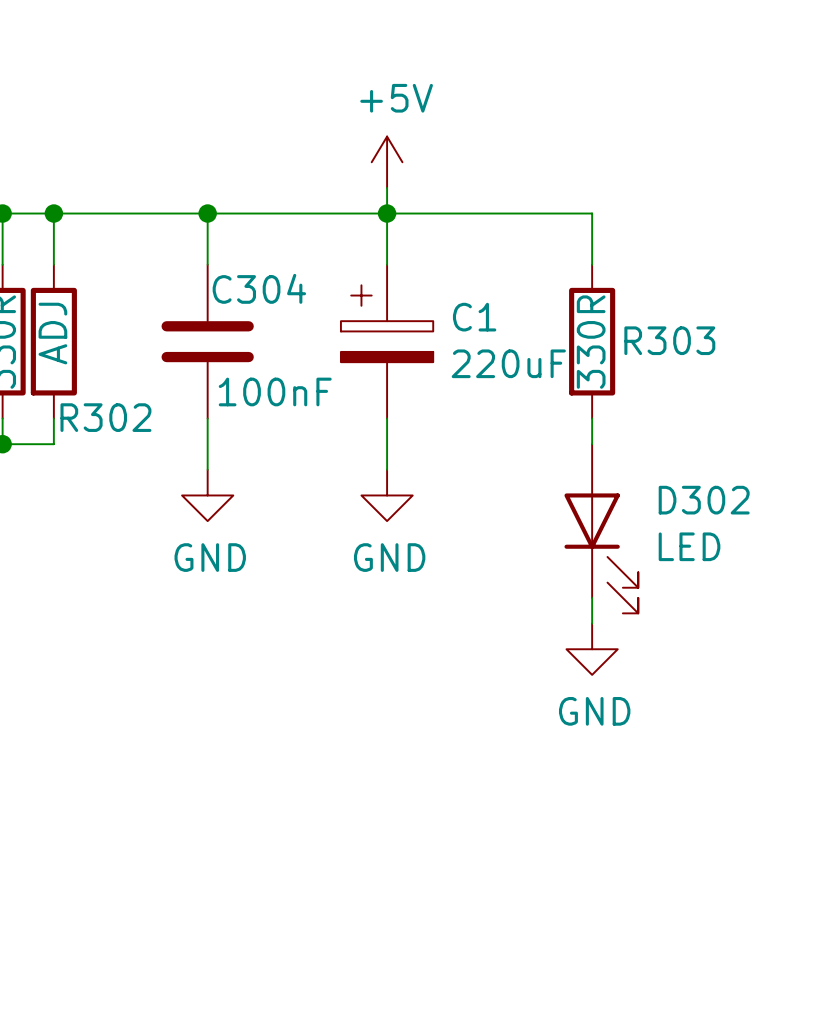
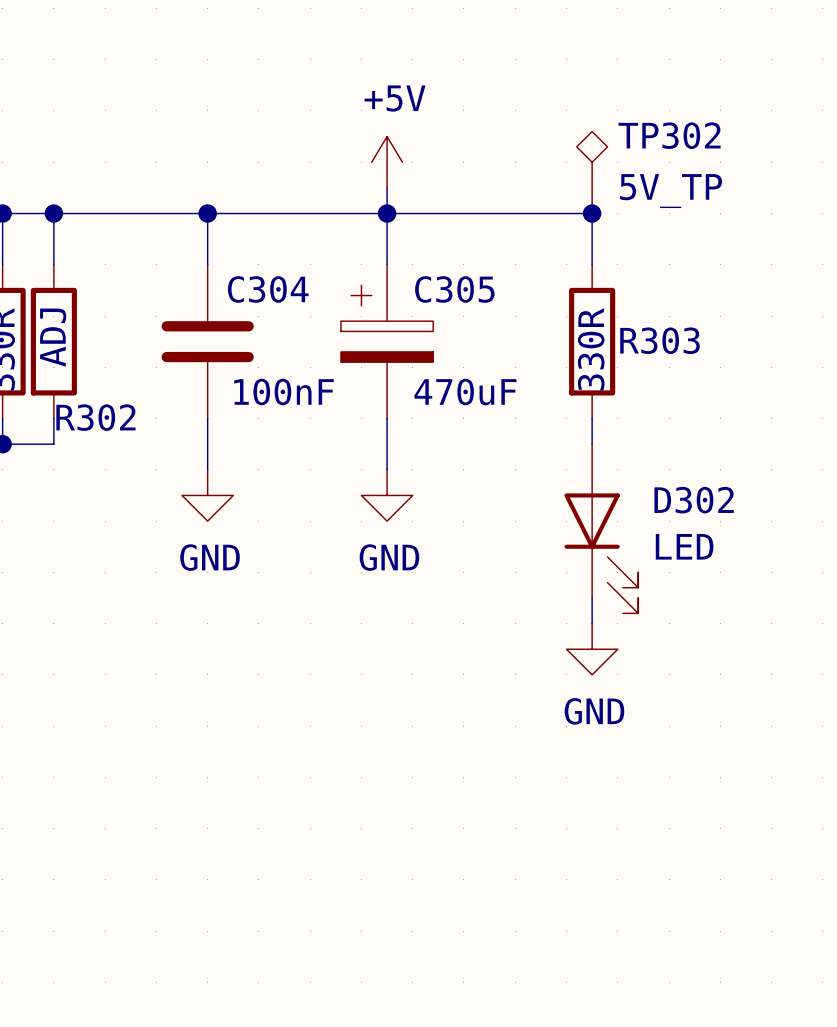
TP302: none -> 5V_TP (592, 172)
junction: none -> (592, 213)
C1 name: C1 (474, 317) -> C305 (454, 289)
C1 value: 220uF (508, 363) -> 470uF (465, 392)

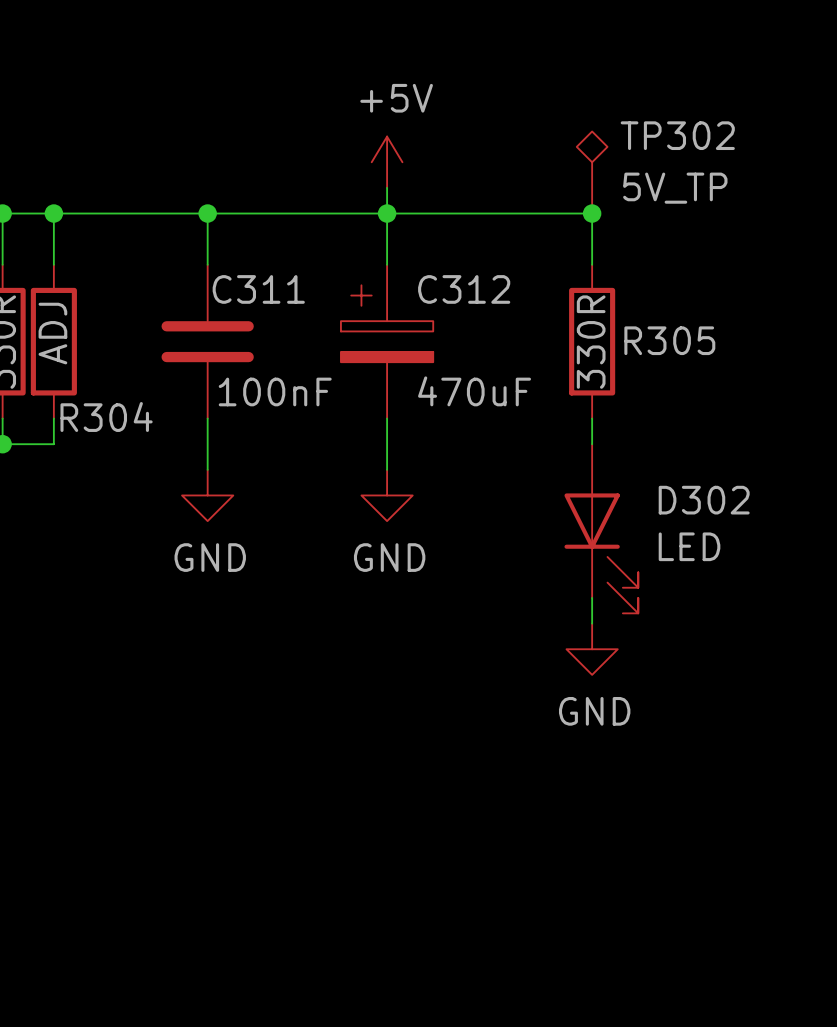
C304 name: C304 (268, 289) -> C311 (258, 289)
C305 name: C305 (454, 289) -> C312 (464, 289)
R303 name: R303 (660, 340) -> R305 (669, 340)
R302 name: R302 (95, 417) -> R304 (106, 417)

